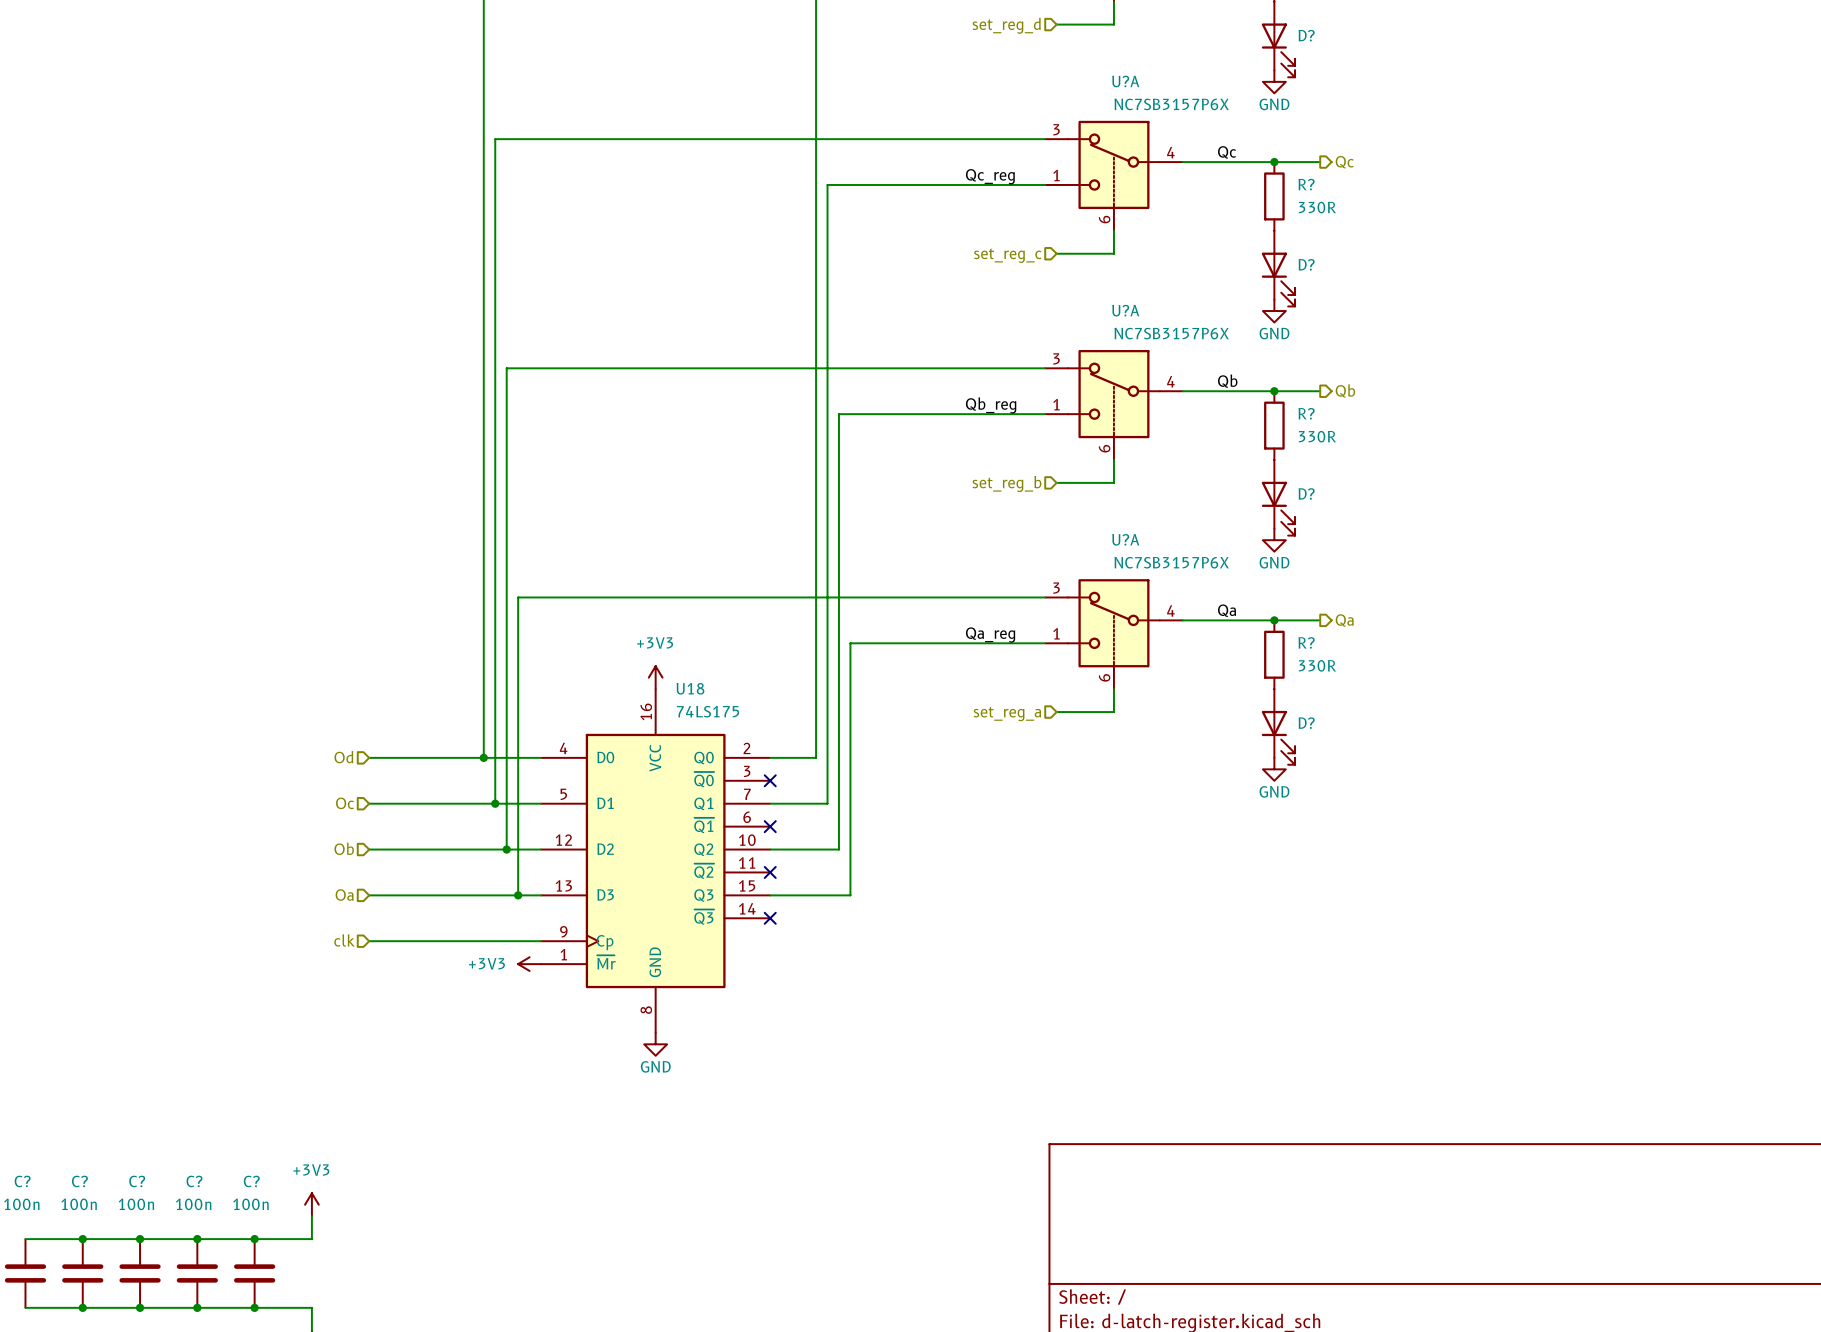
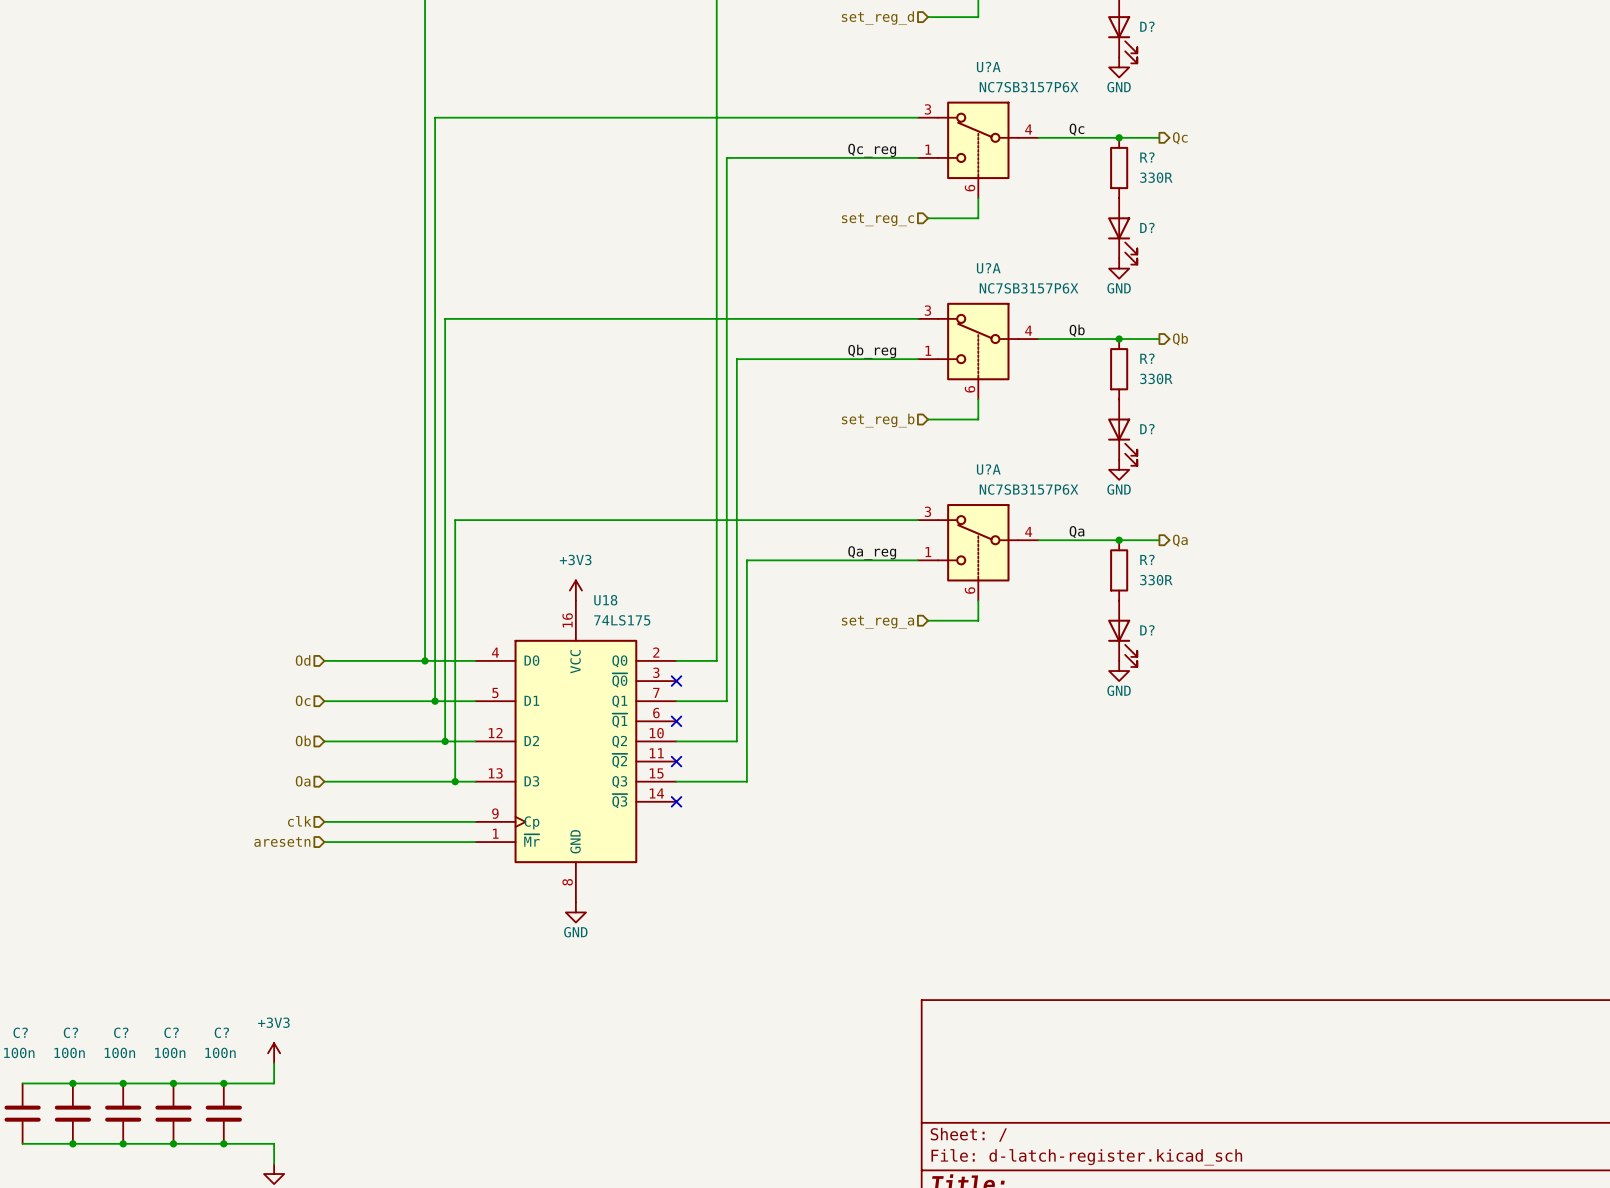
hierarchical label: none -> aresetn (282, 841)
wire: none -> (324, 842) (475, 842)
power symbol: +3V3 (529, 964) -> none

